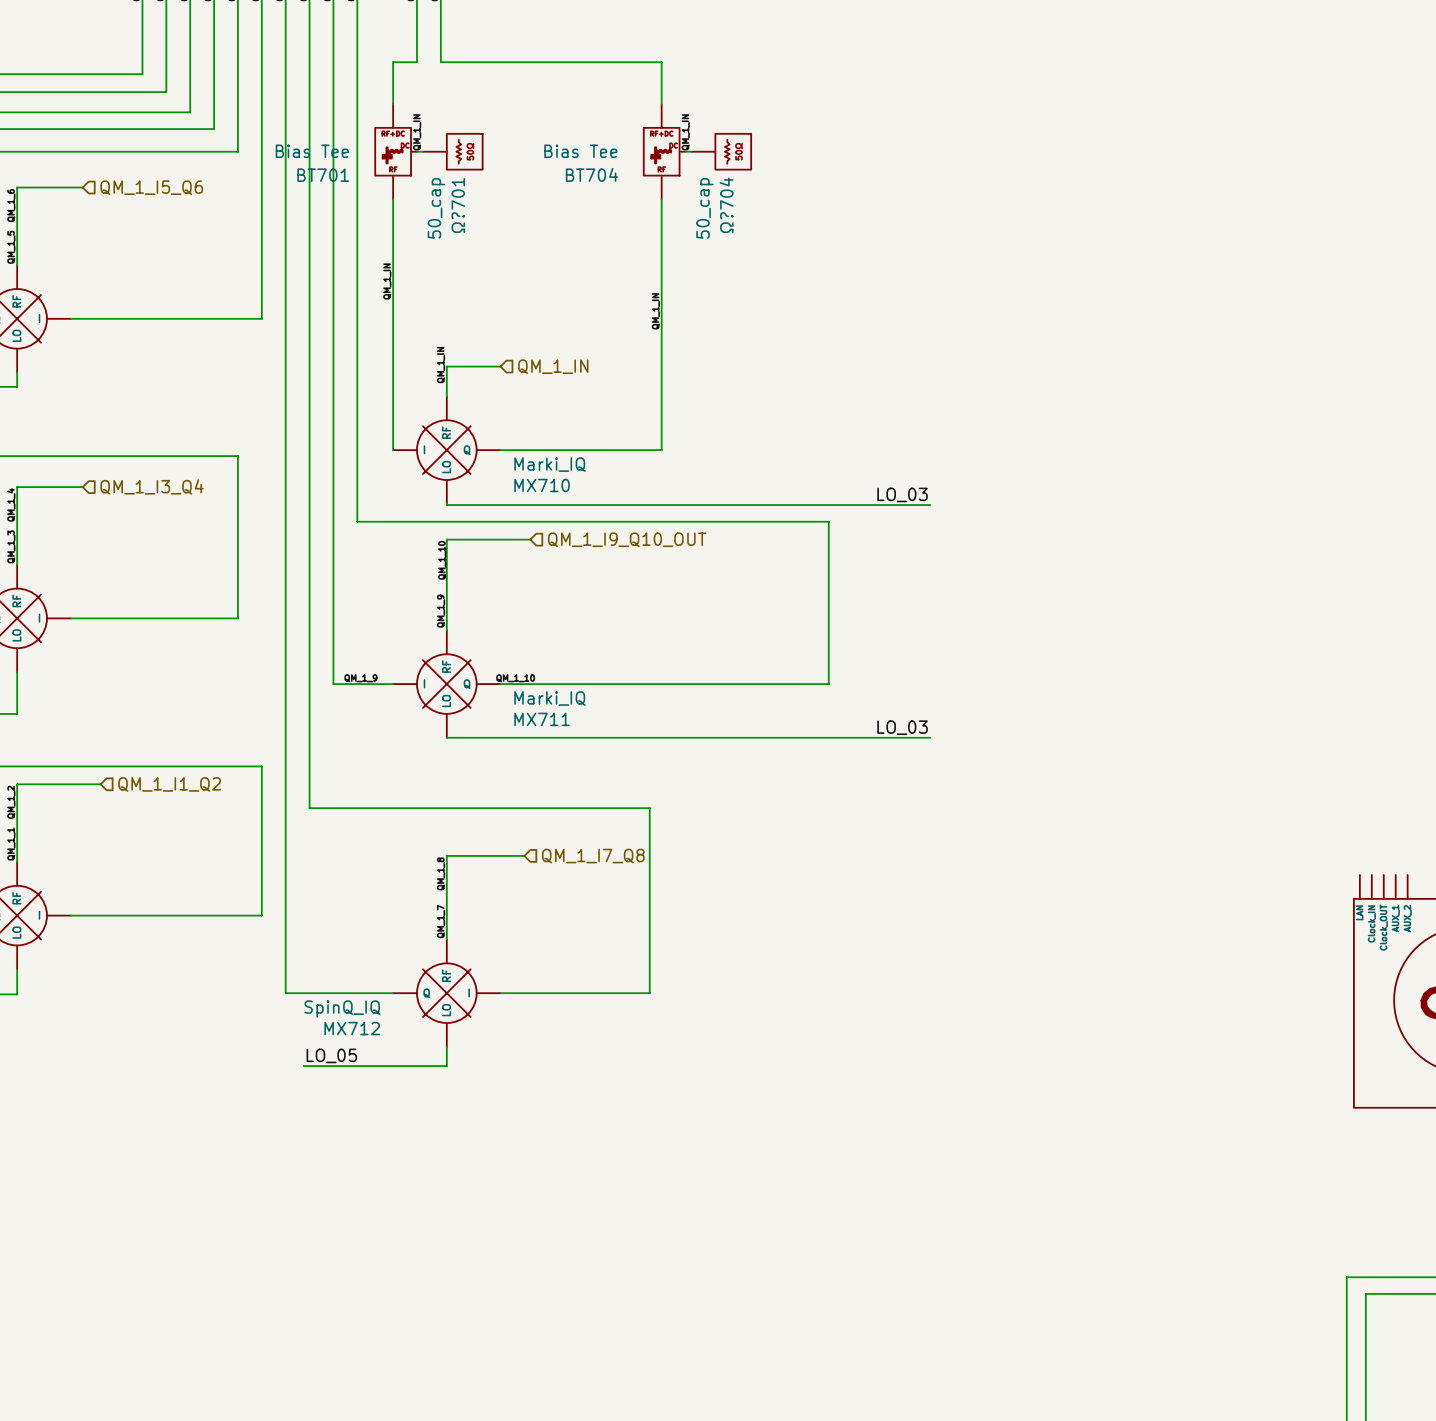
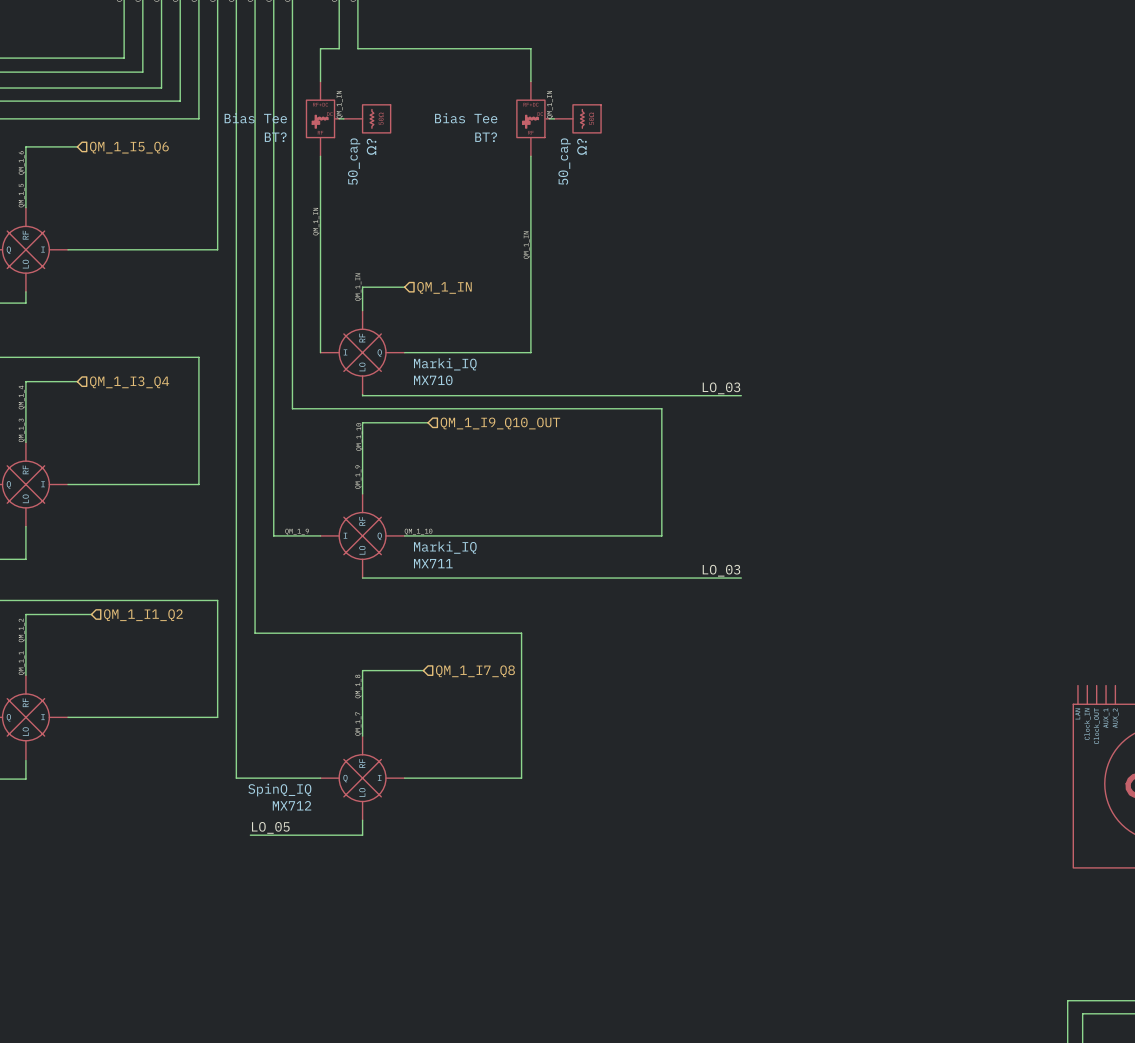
BT704 name: BT704 (591, 174) -> BT? (486, 137)
BT701 name: BT701 (323, 175) -> BT? (275, 137)
Ω?701 name: Ω?701 (458, 205) -> Ω? (371, 146)
Ω?704 name: Ω?704 (726, 205) -> Ω? (581, 146)

